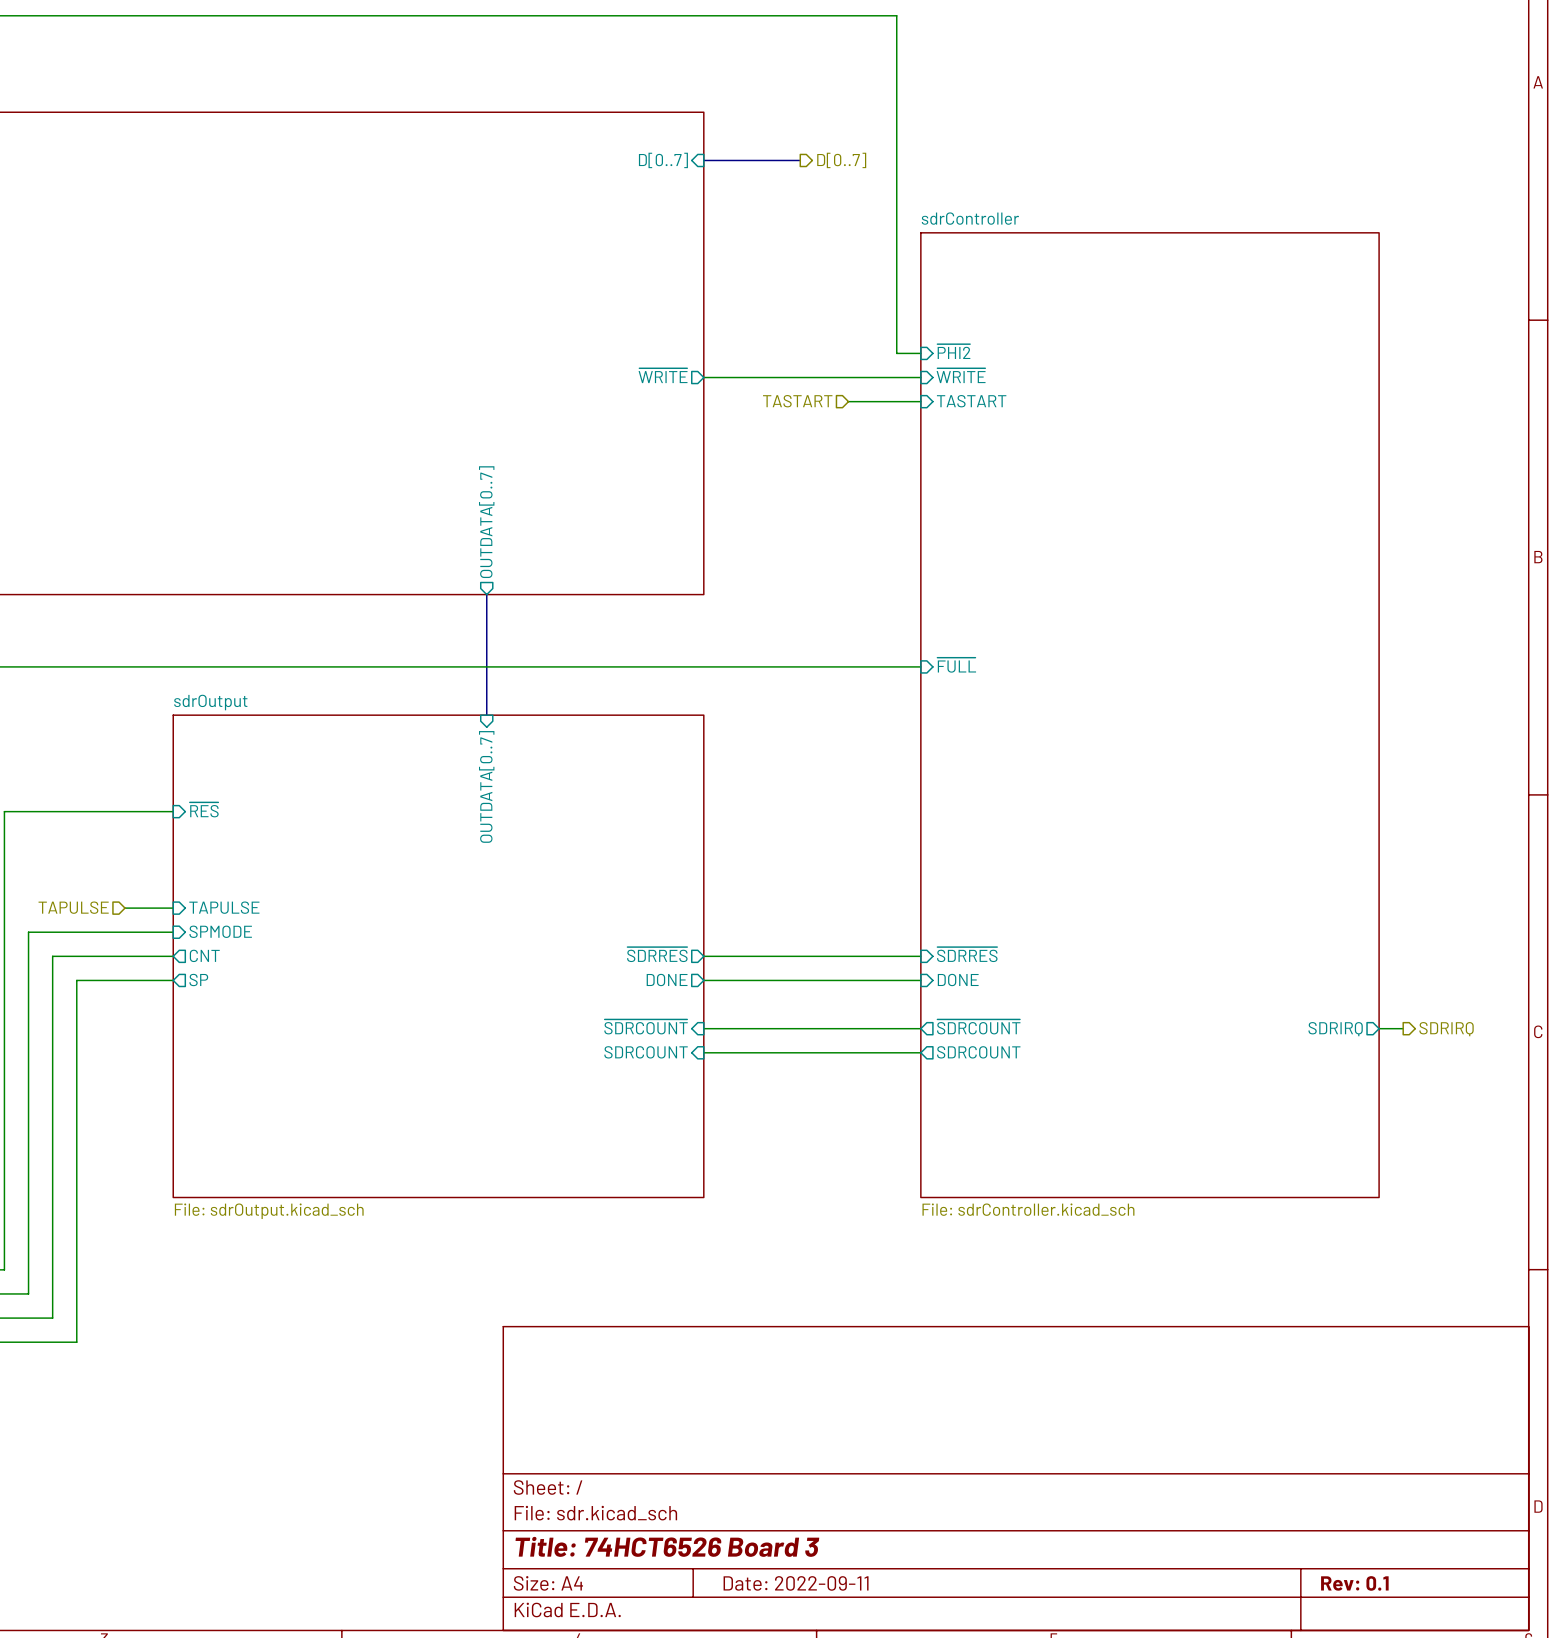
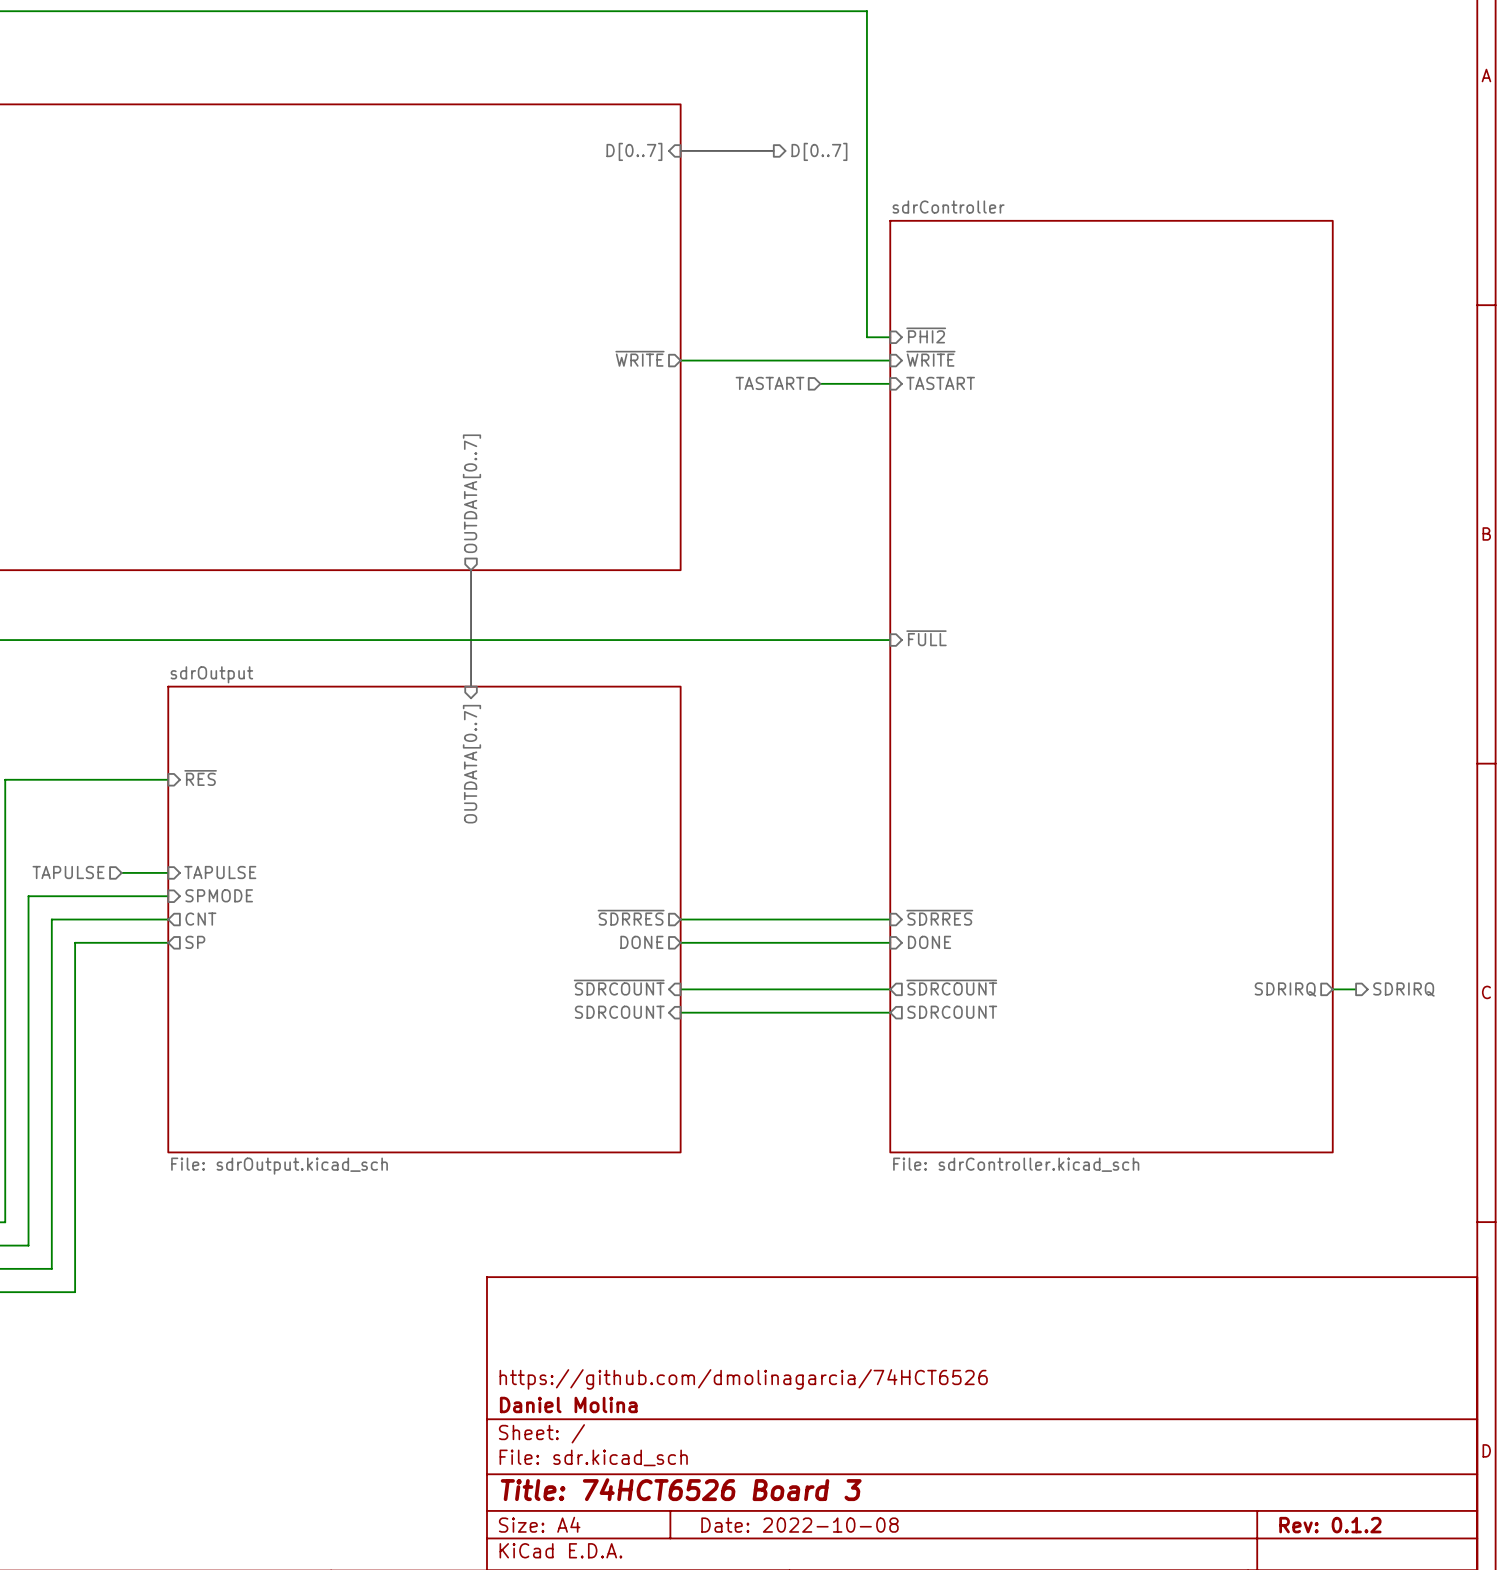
title block: none -> https://github.com/dmolinagarcia/74HCT6526 (743, 1379)
title block: none -> Daniel Molina (568, 1404)
title block: Date: 2022-09-11 (796, 1583) -> Date: 2022-10-08 (799, 1525)
title block: Rev: 0.1 (1354, 1583) -> Rev: 0.1.2 (1330, 1525)

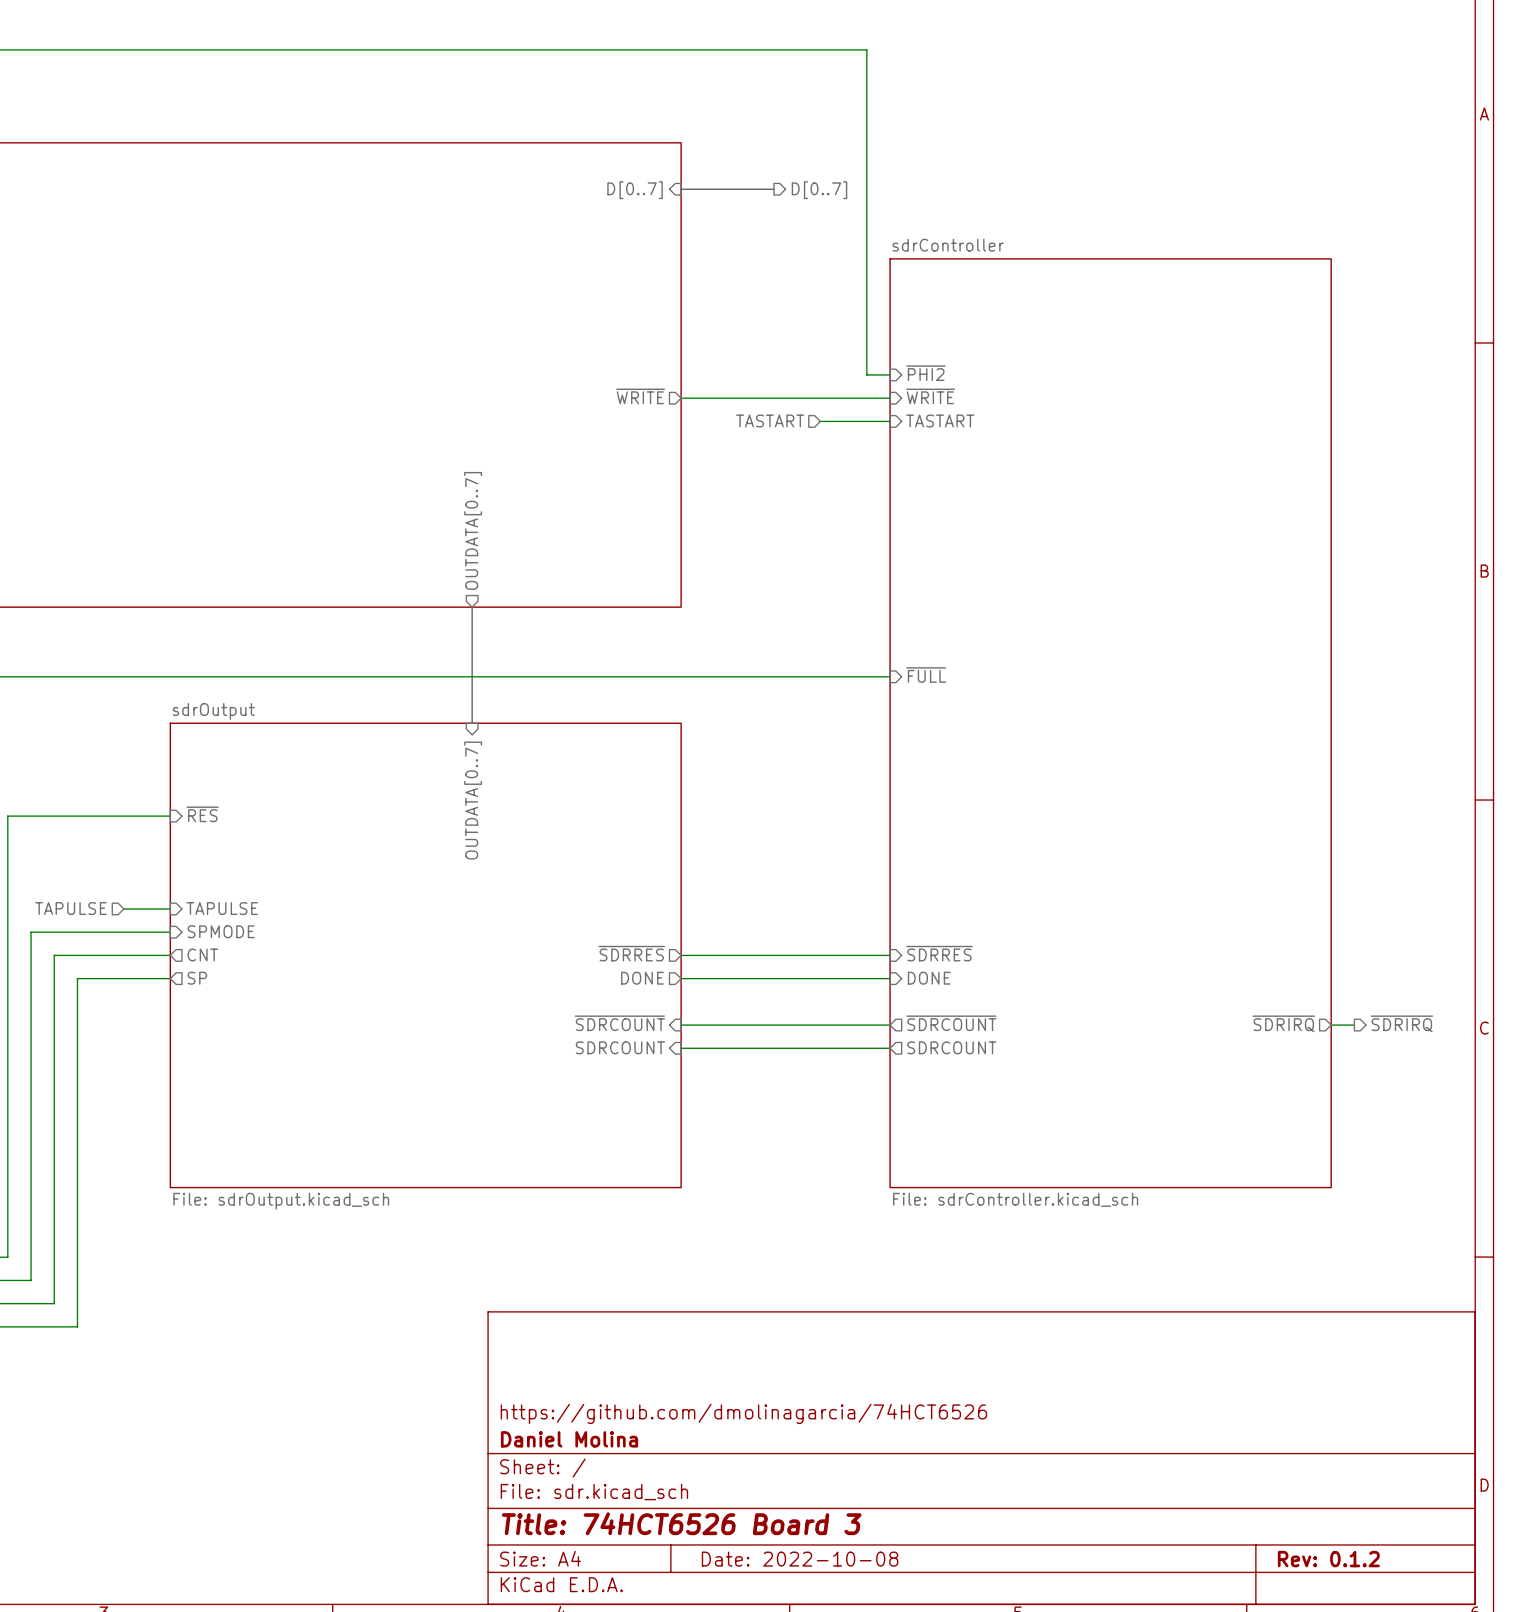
sheet pin: SDRIRQ (1285, 989) -> ~{SDRIRQ} (1283, 1023)
hierarchical label: SDRIRQ (1403, 989) -> ~{SDRIRQ} (1401, 1023)

